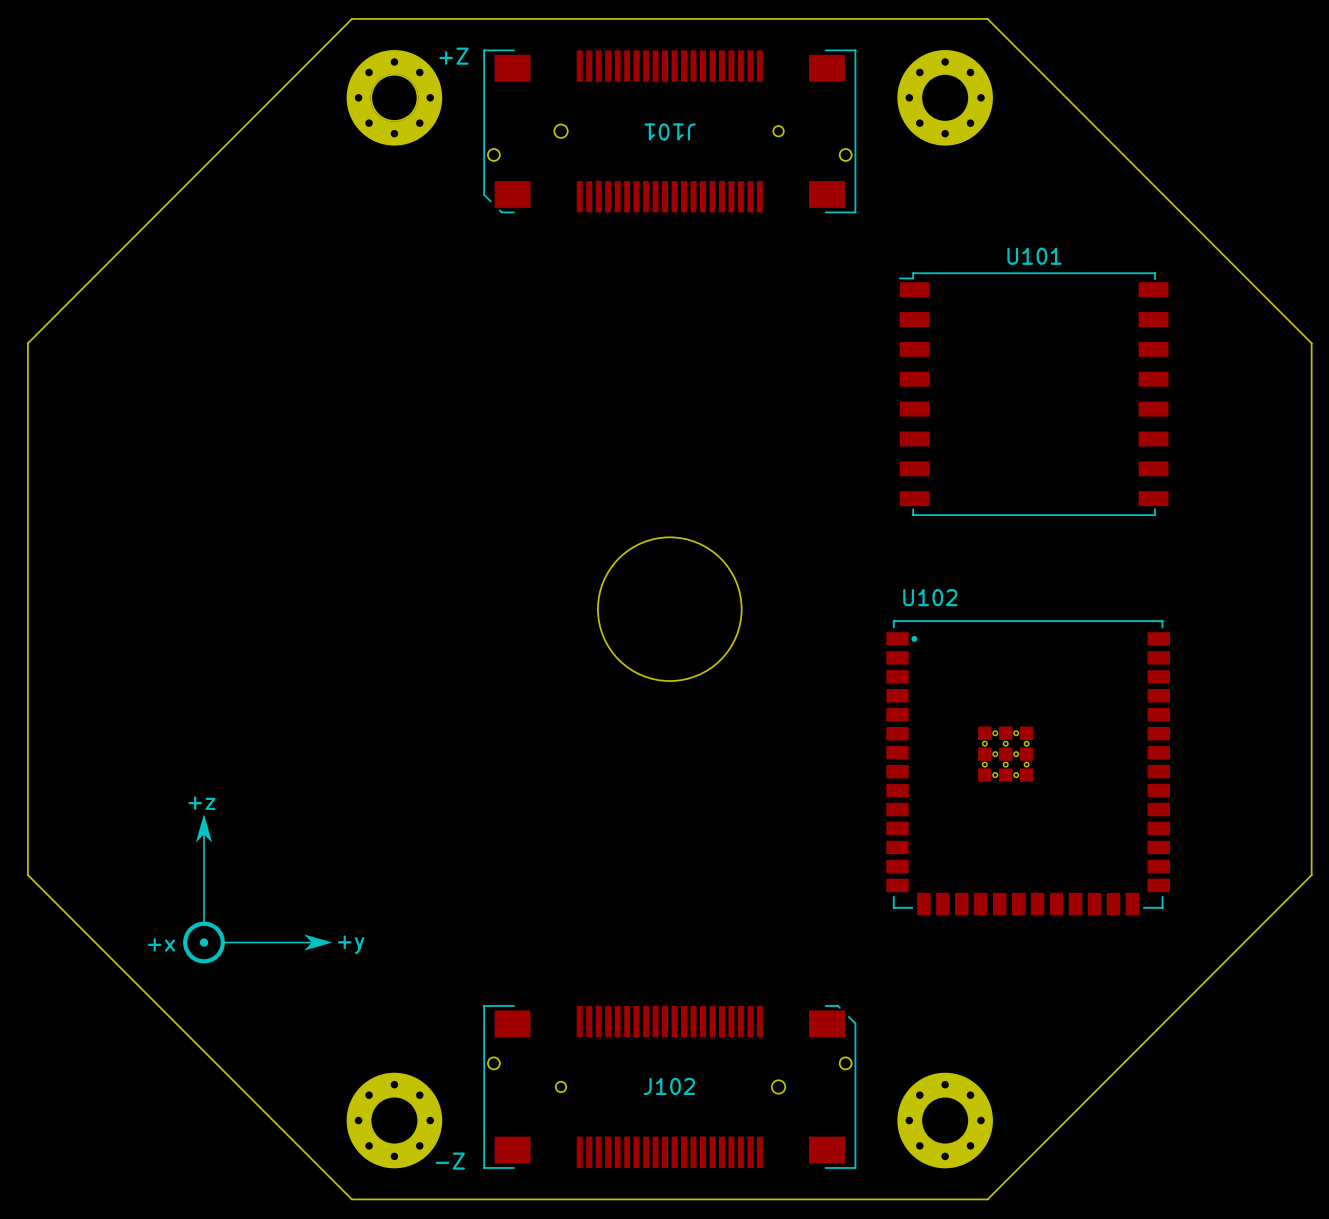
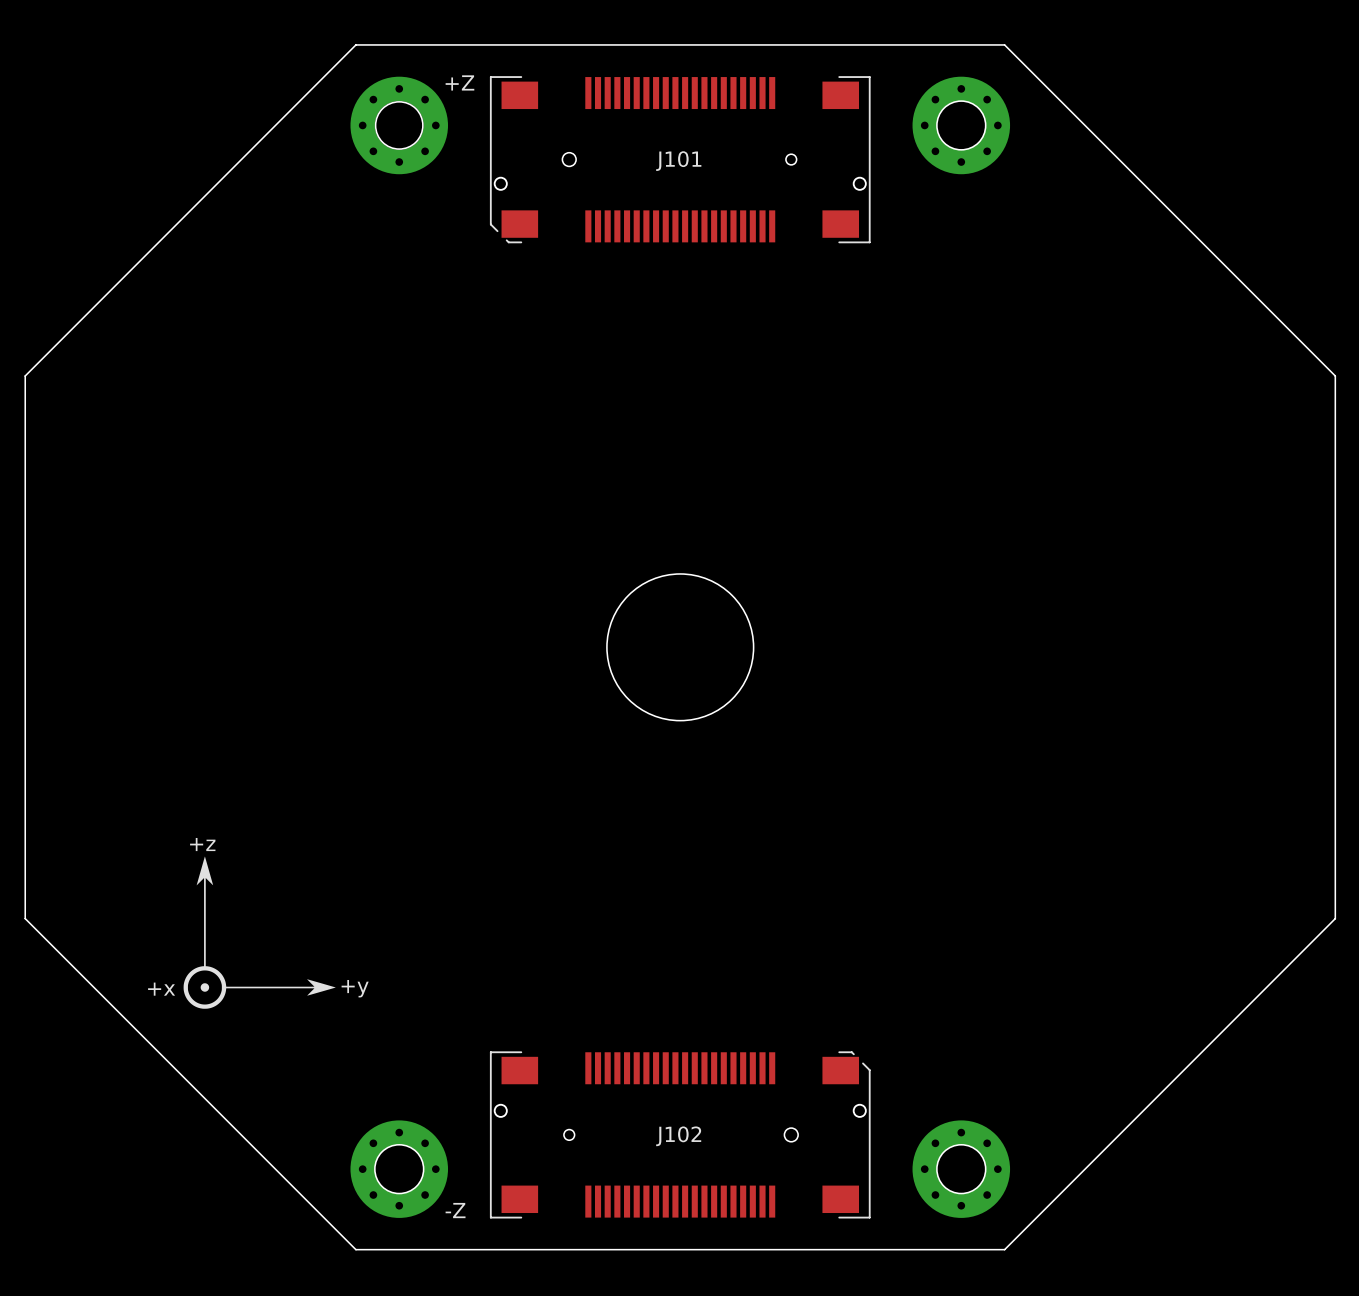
J101 name rotation: 0° (670, 131) -> 180° (678, 161)
U101: (1033, 394) -> none
U102: (1028, 767) -> none

